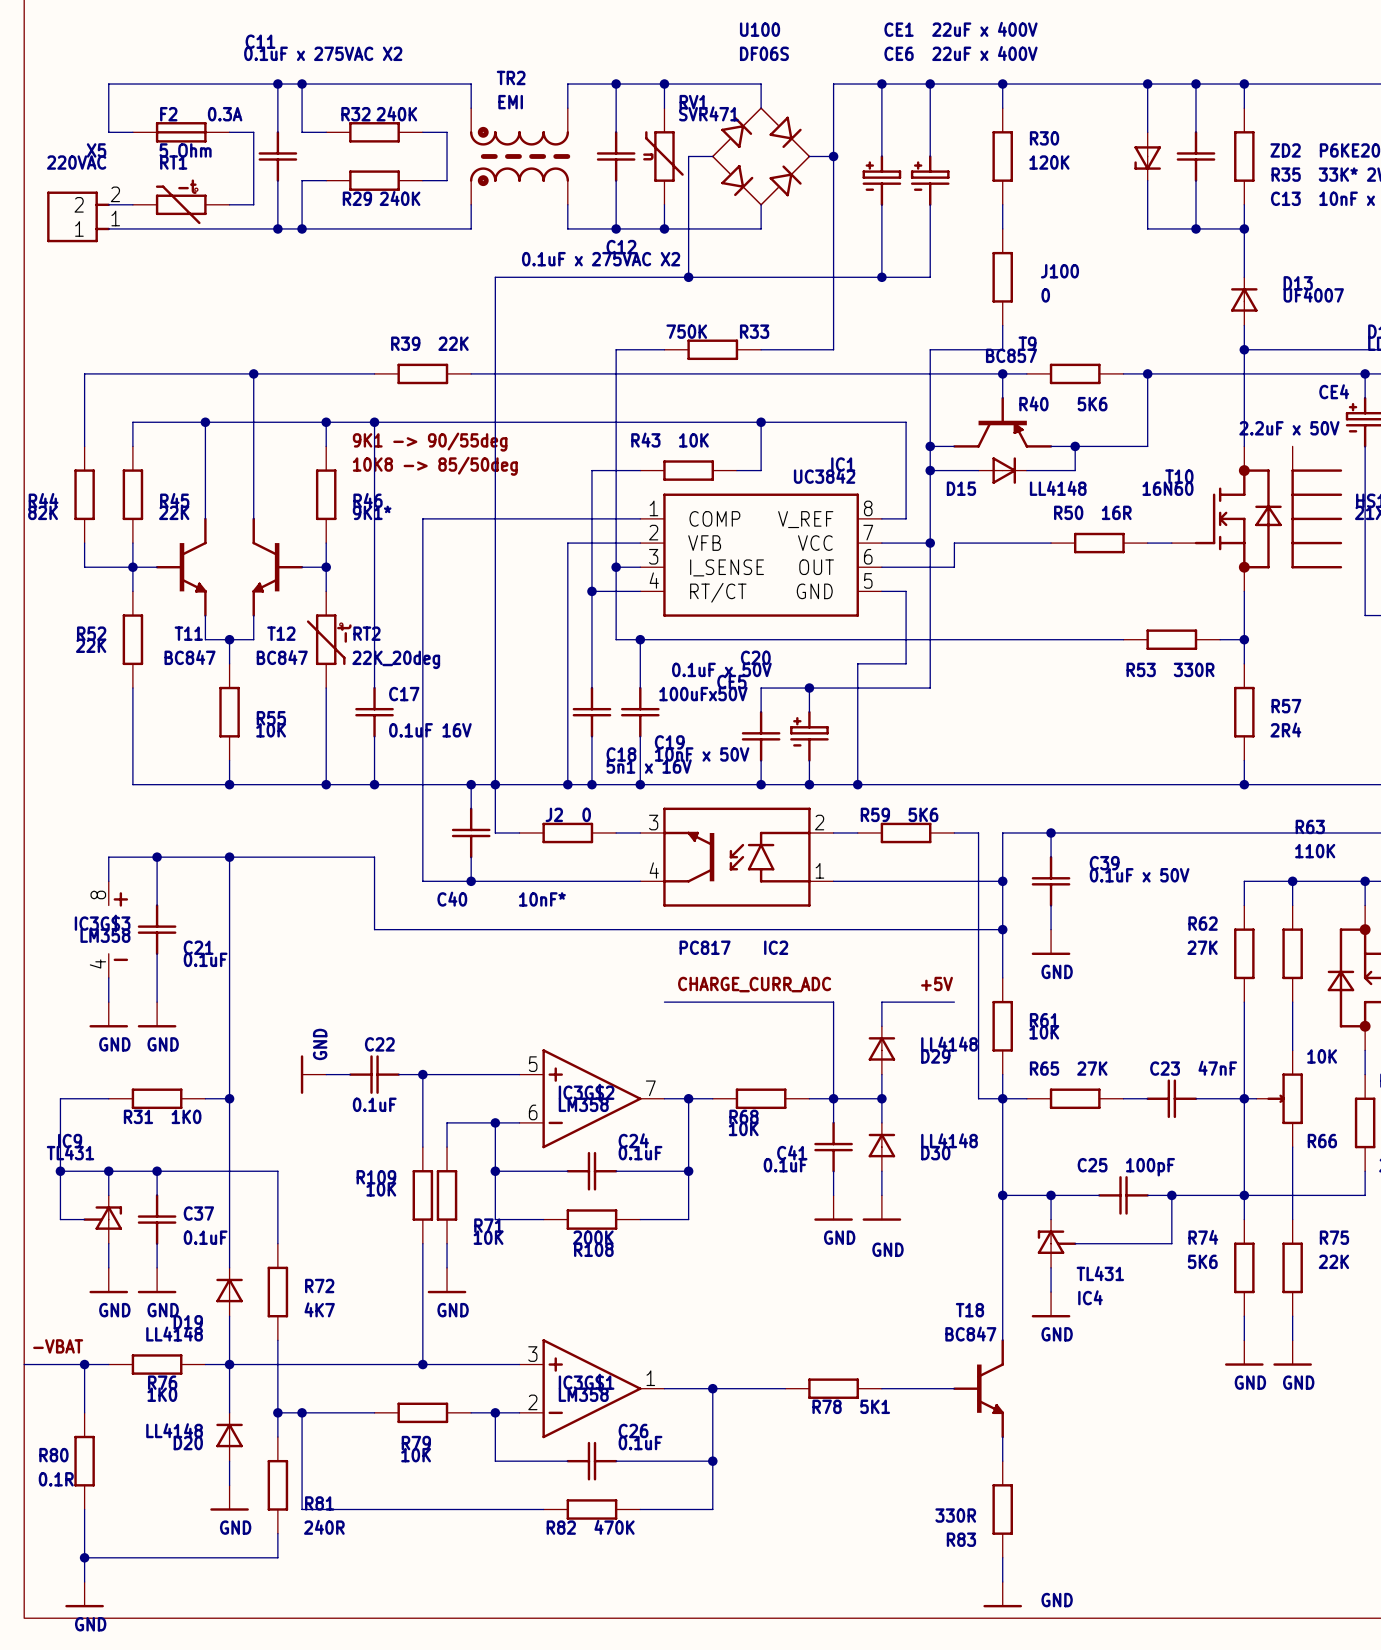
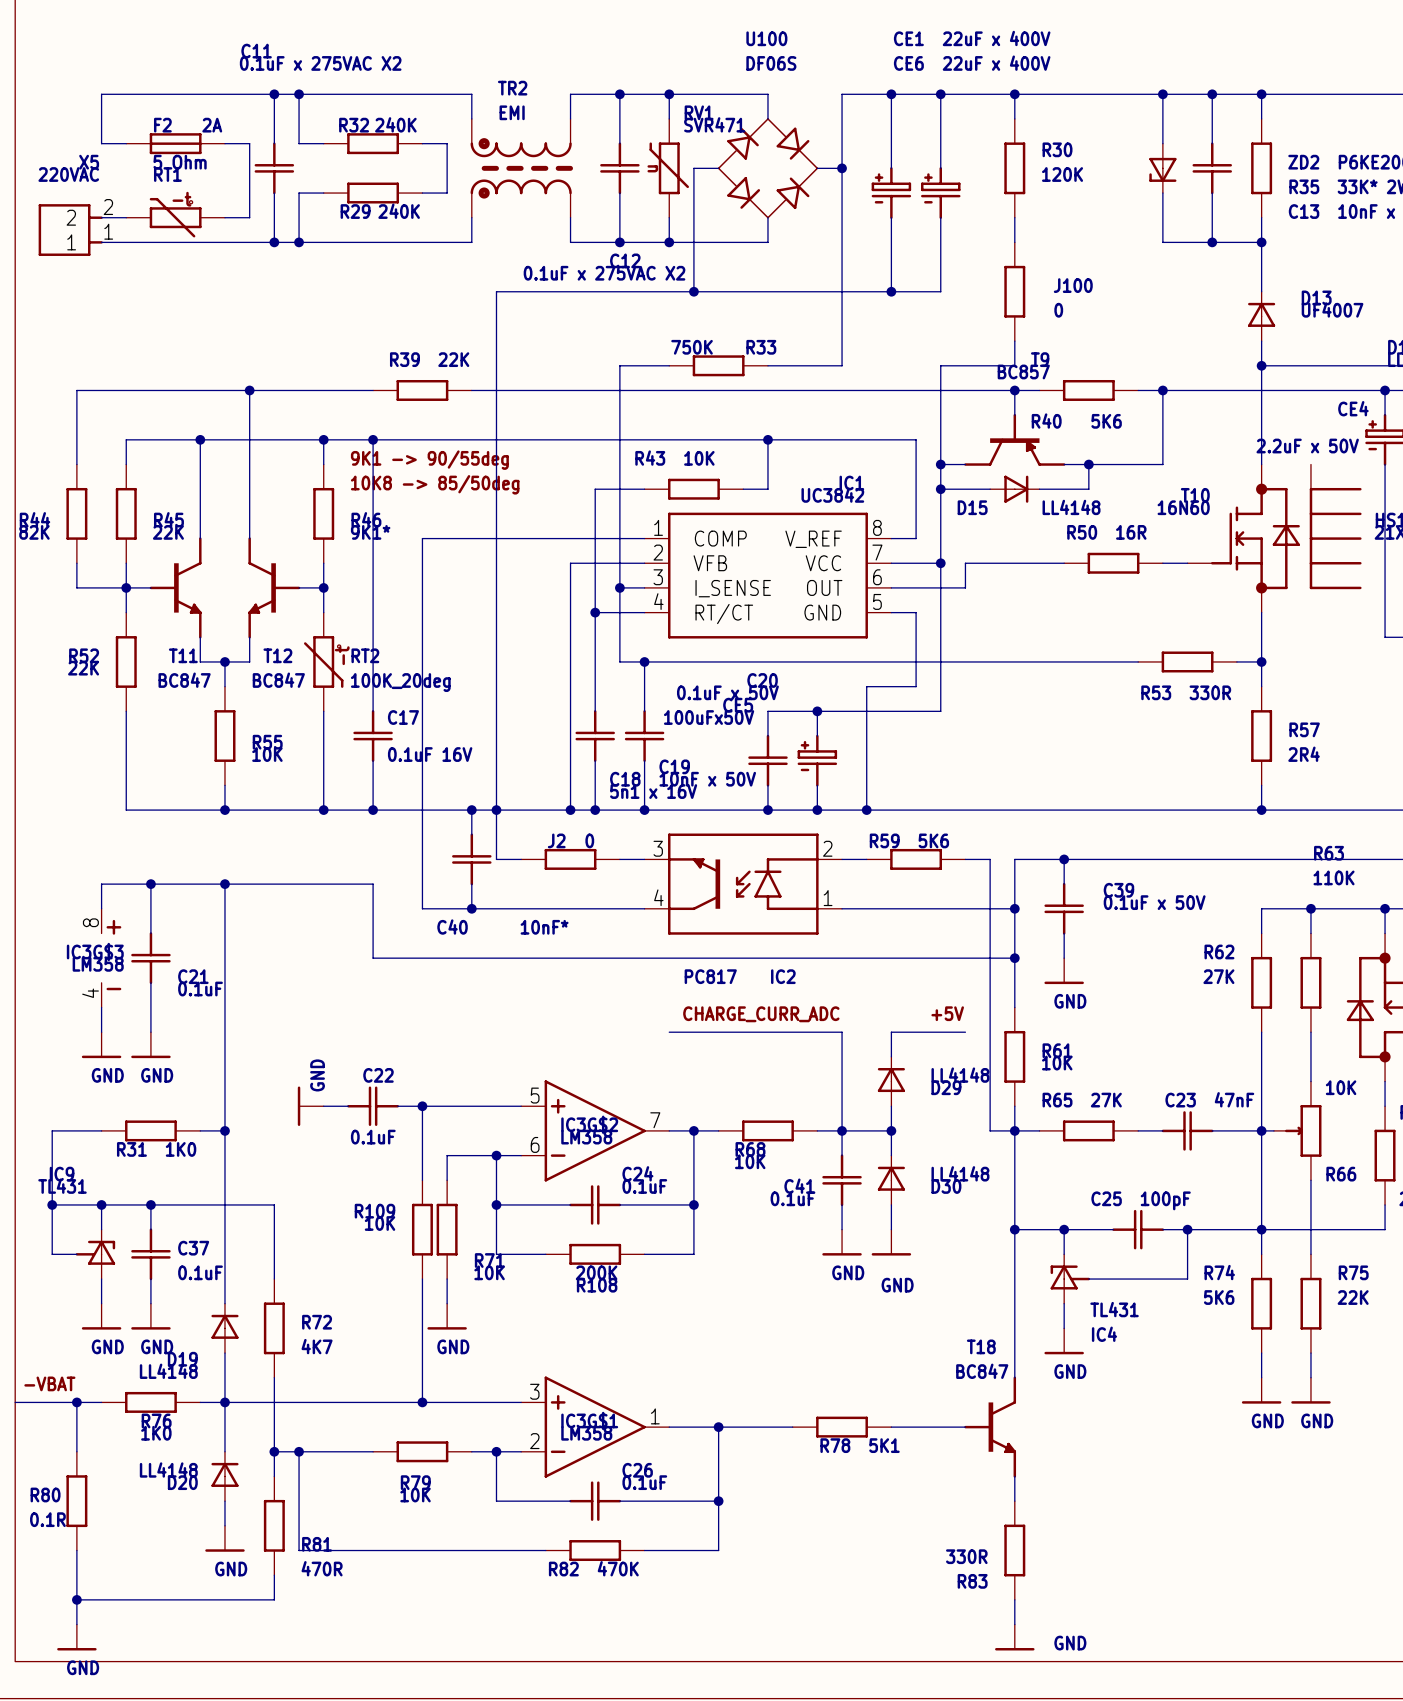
F2 value: 0.3A (225, 114) -> 2A (212, 125)
RT2 value: 22K_20deg (396, 659) -> 100K_20deg (400, 682)
R81 value: 240R (324, 1527) -> 470R (322, 1568)

